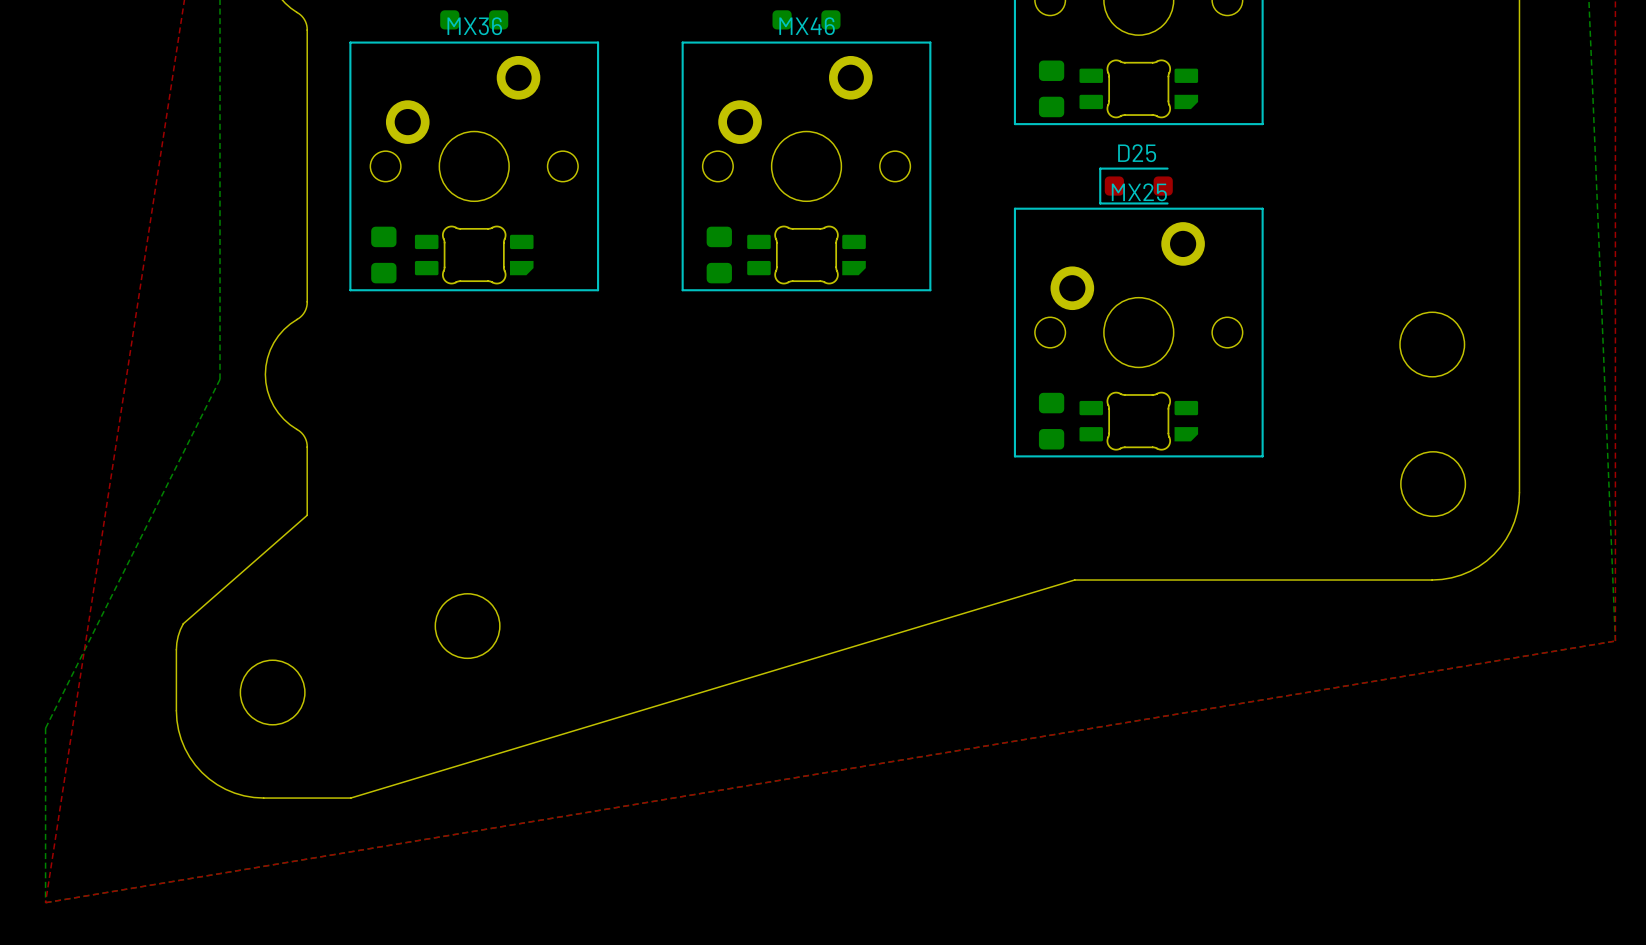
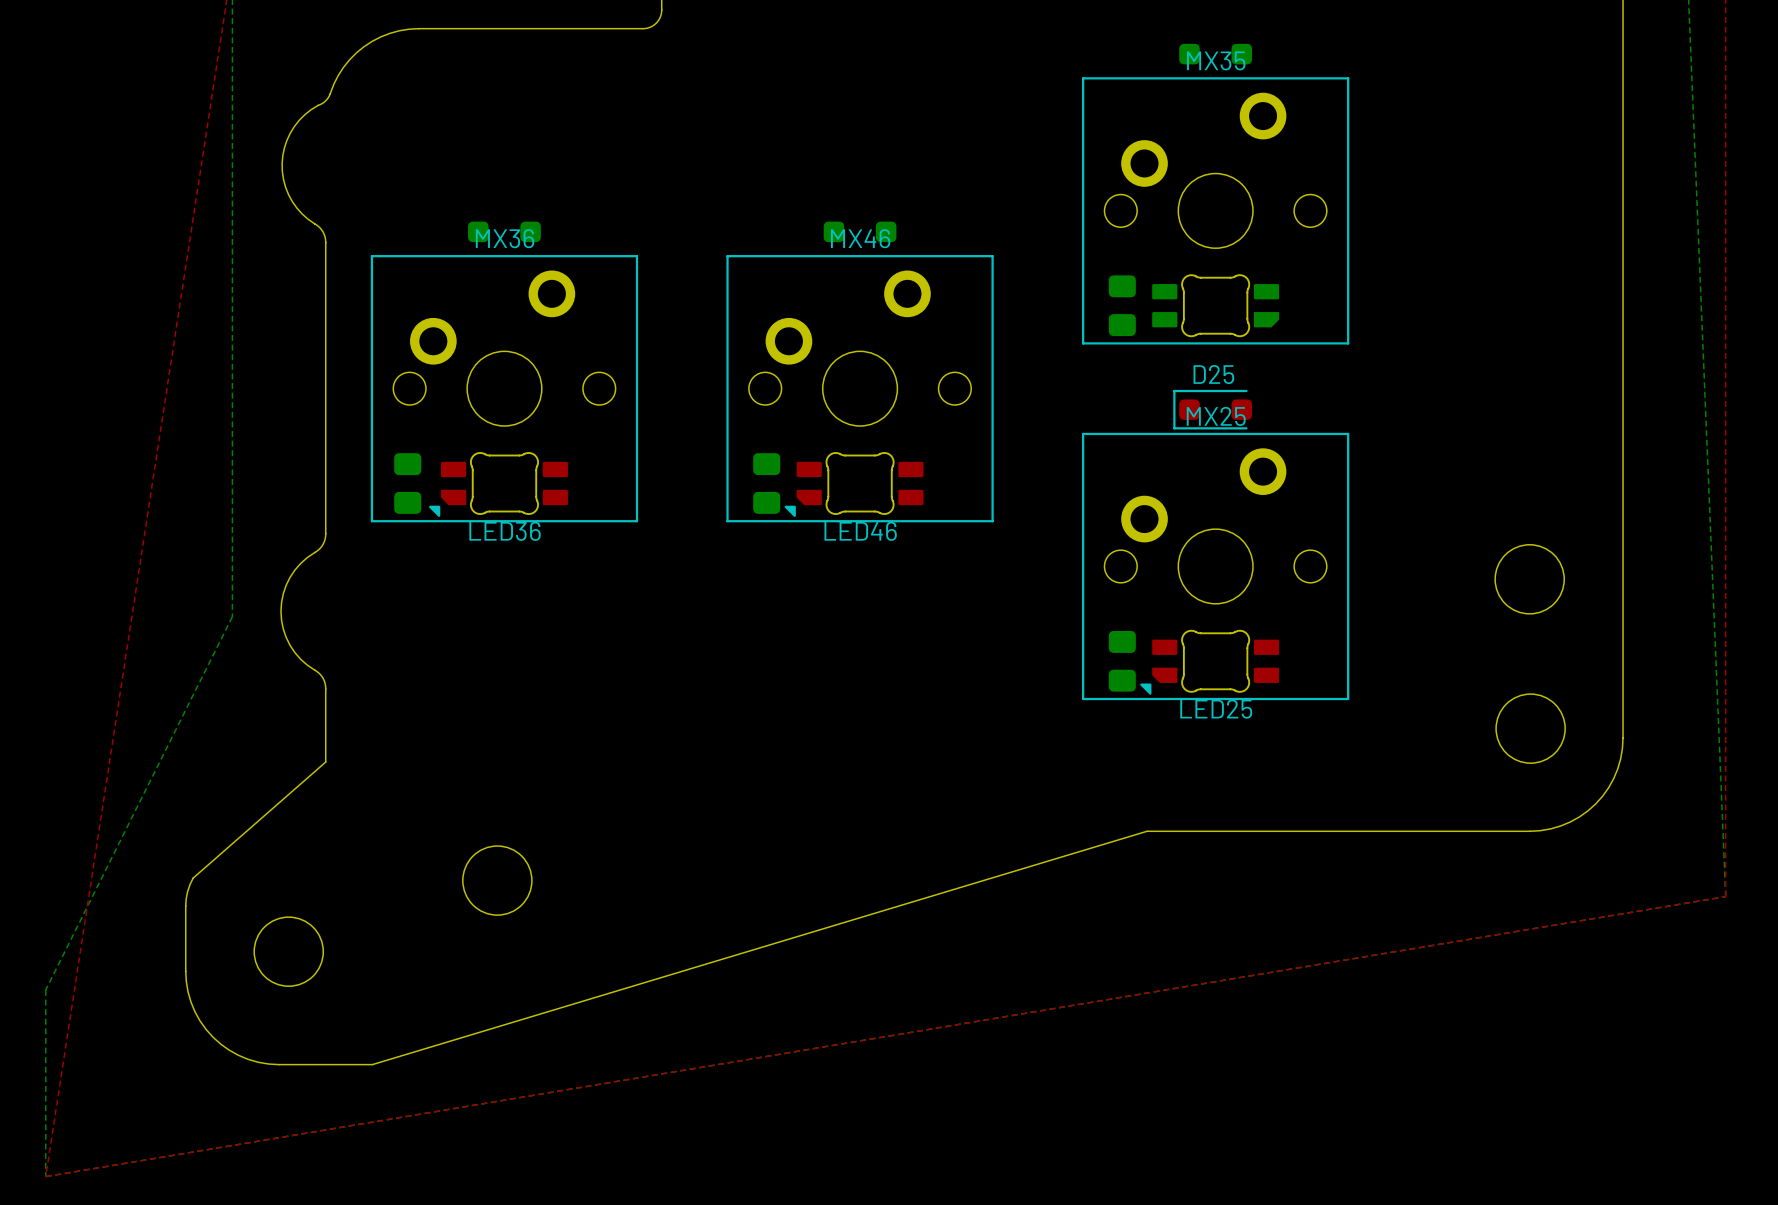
LED36 side: bottom (474, 255) -> top (498, 484)
LED46 side: bottom (806, 255) -> top (854, 484)
LED25 side: bottom (1138, 421) -> top (1209, 662)

